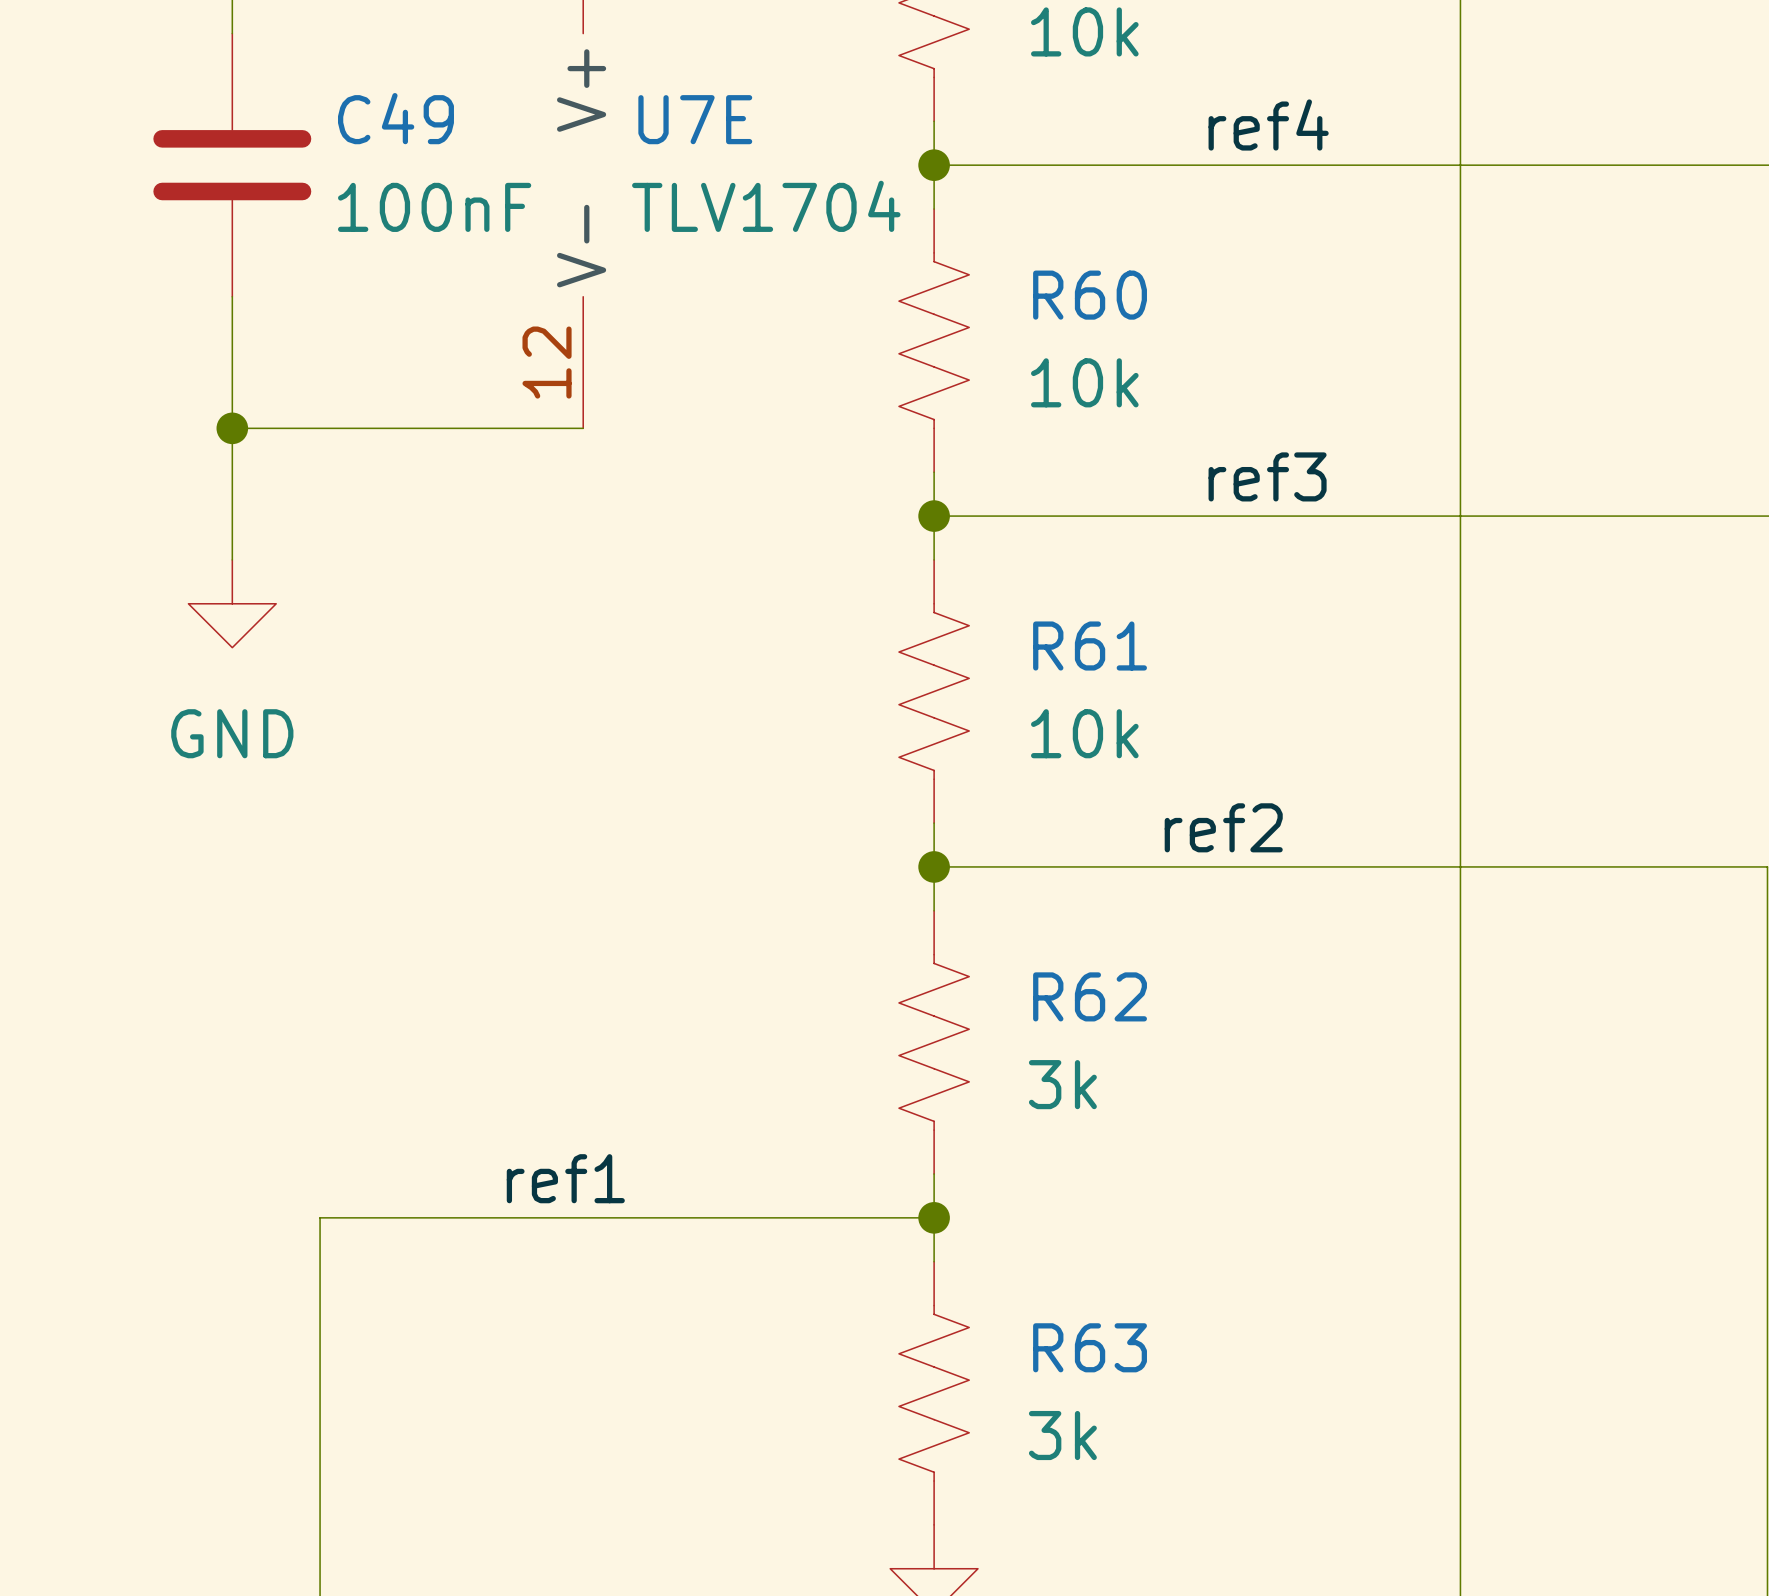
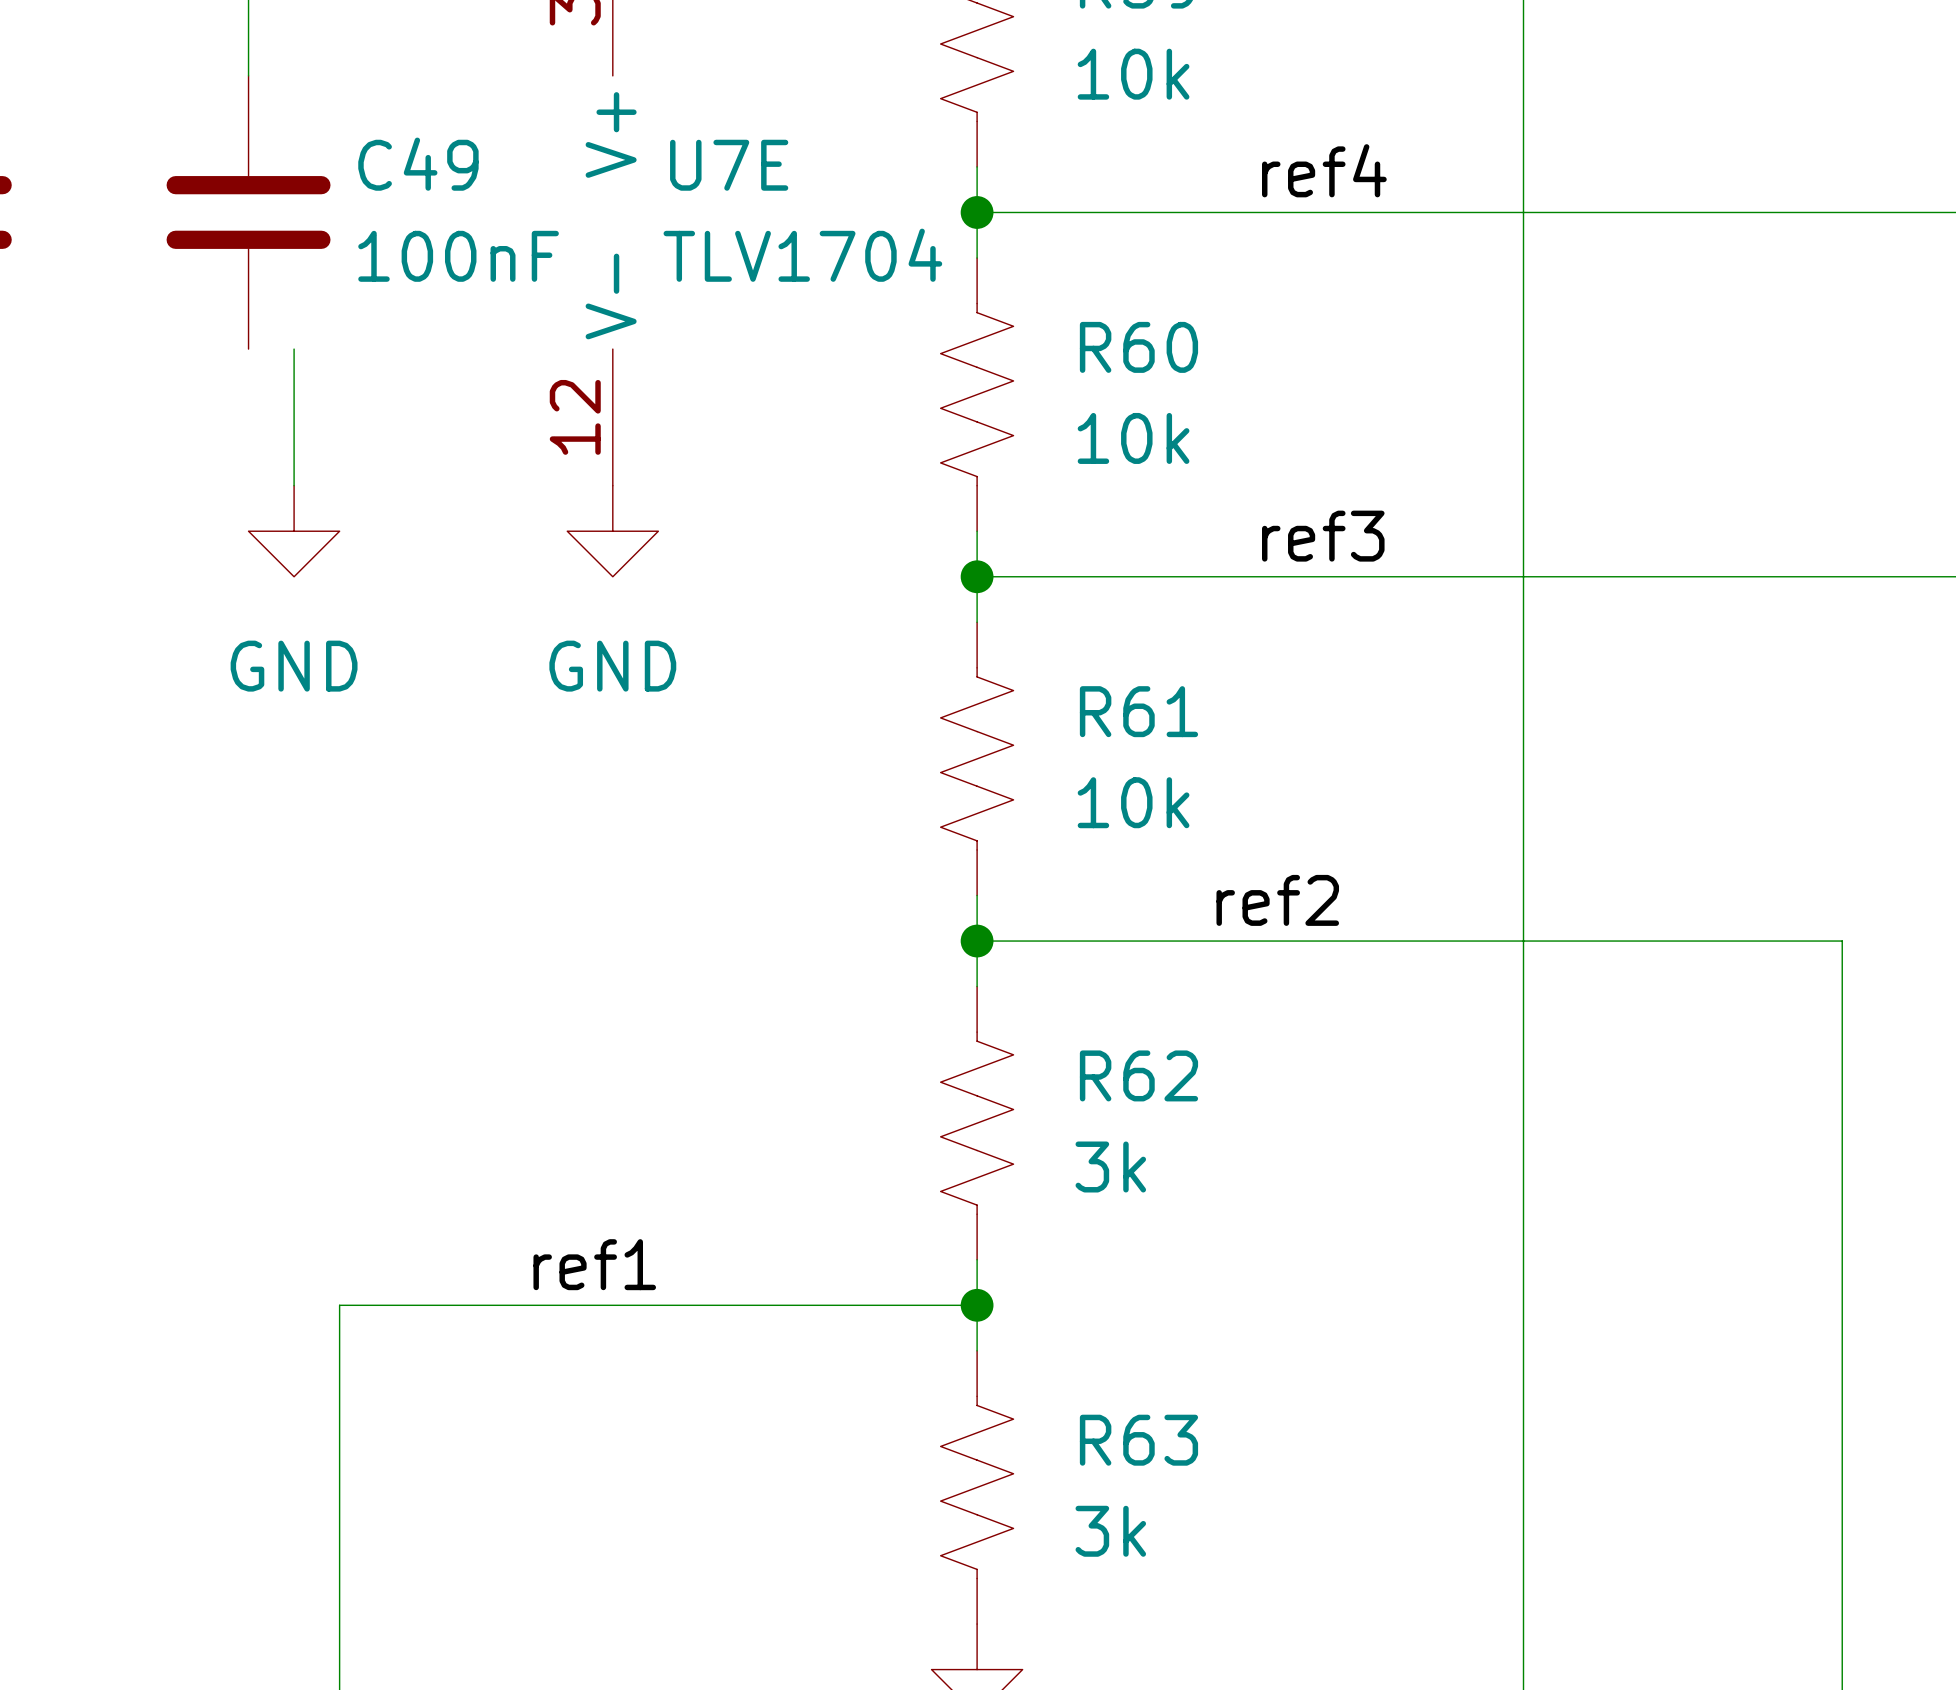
wire: (232, 296) (232, 559) -> none
wire: none -> (294, 349) (294, 485)
wire: (232, 428) (583, 428) -> none
junction: (232, 428) -> none
power symbol: none -> GND (612, 531)
power symbol position: GND (232, 603) -> GND (294, 531)

